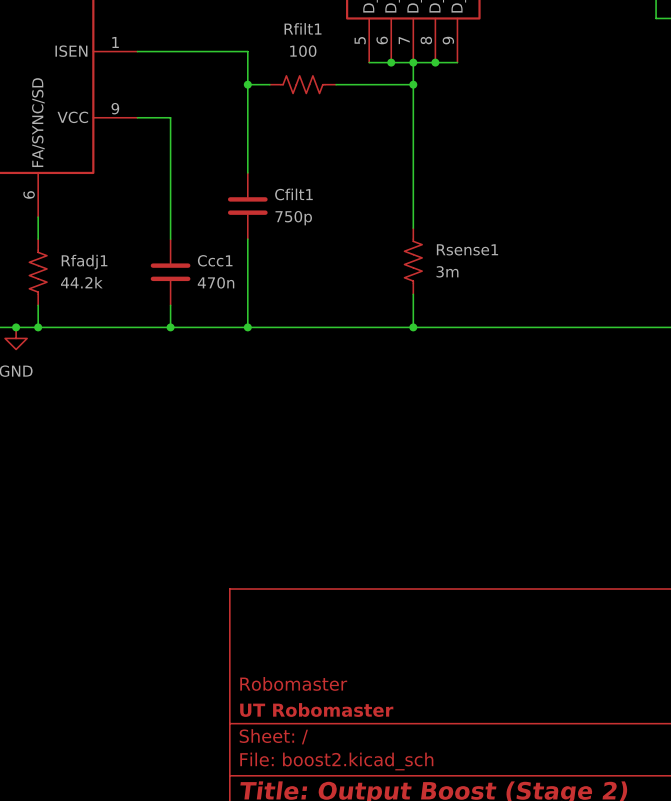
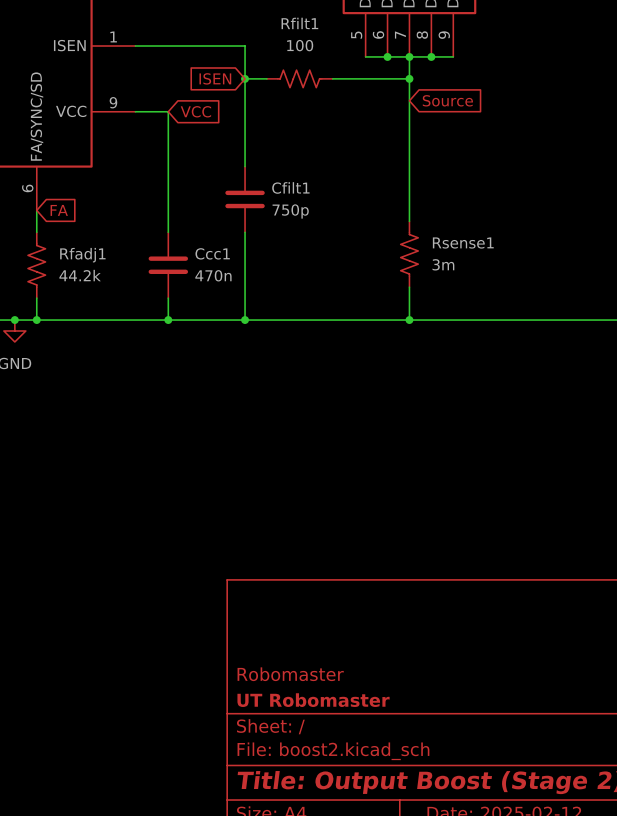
global label: none -> ISEN (215, 78)
global label: none -> Source (447, 100)
global label: none -> VCC (195, 111)
global label: none -> FA (59, 210)

